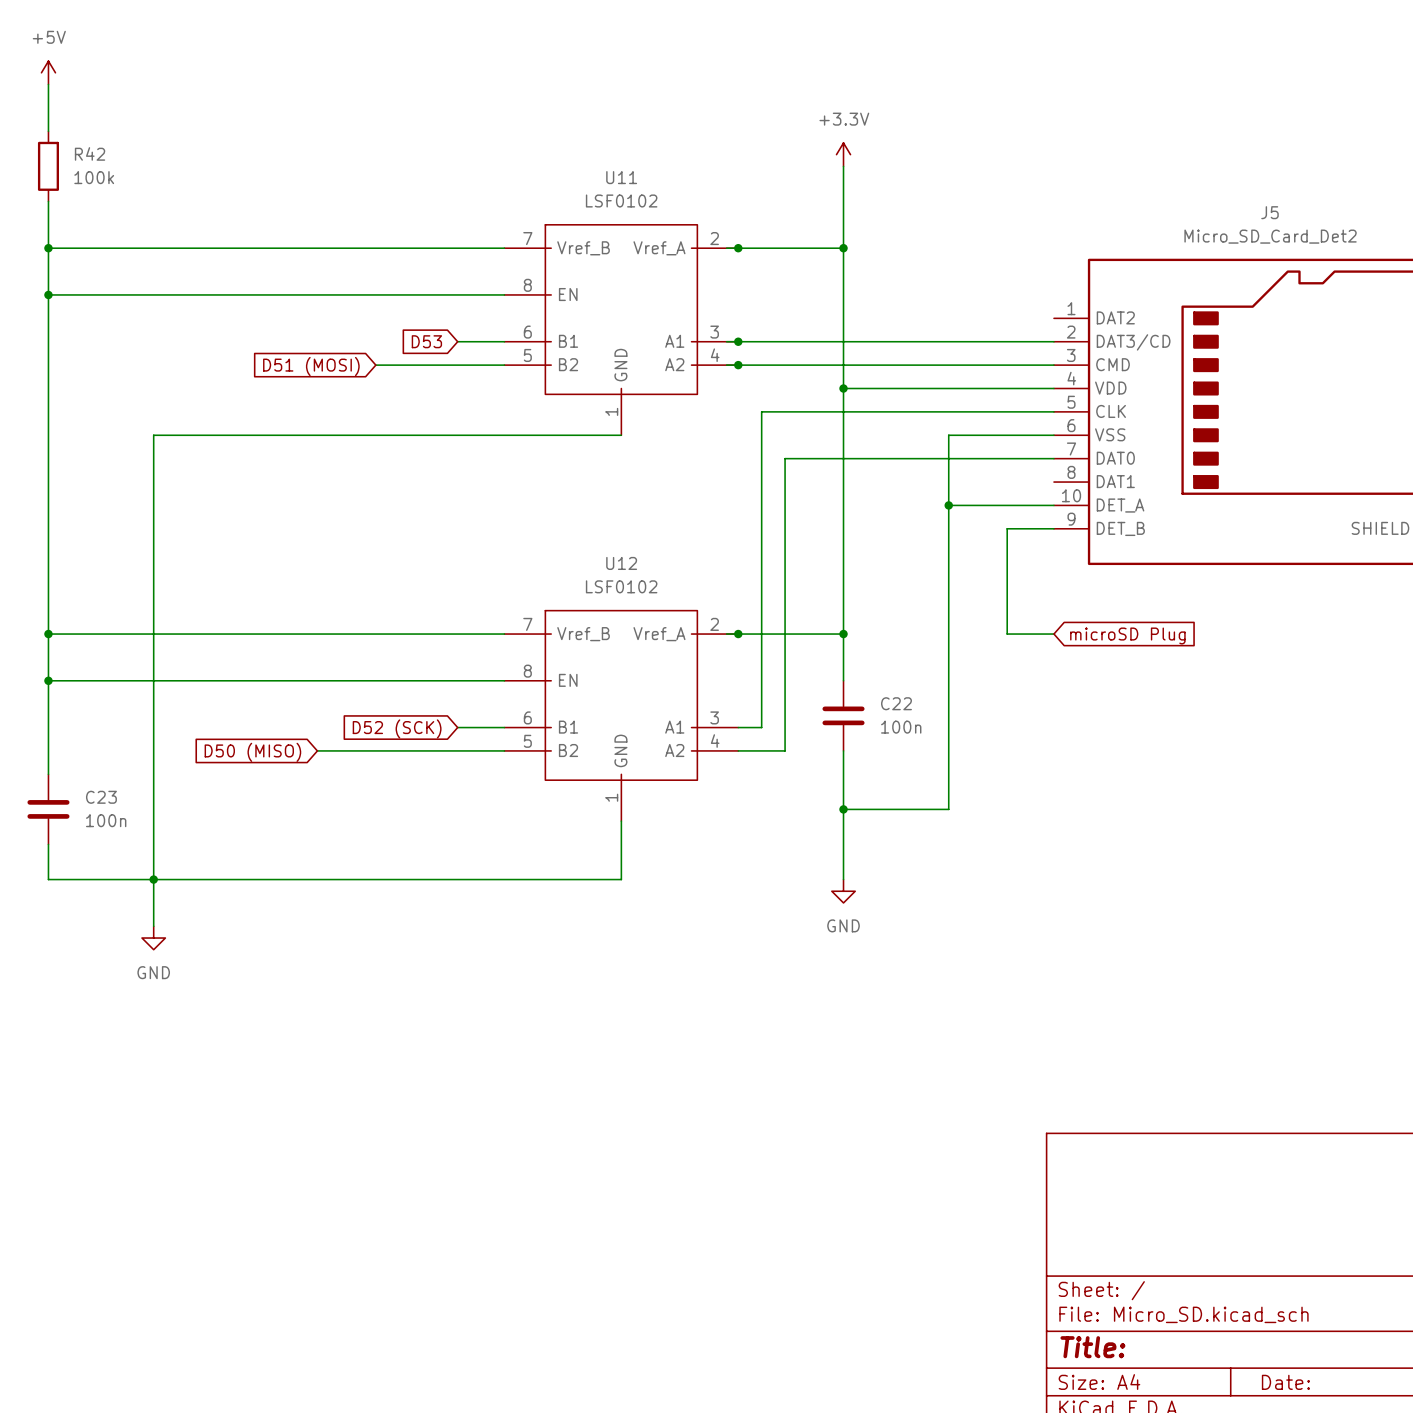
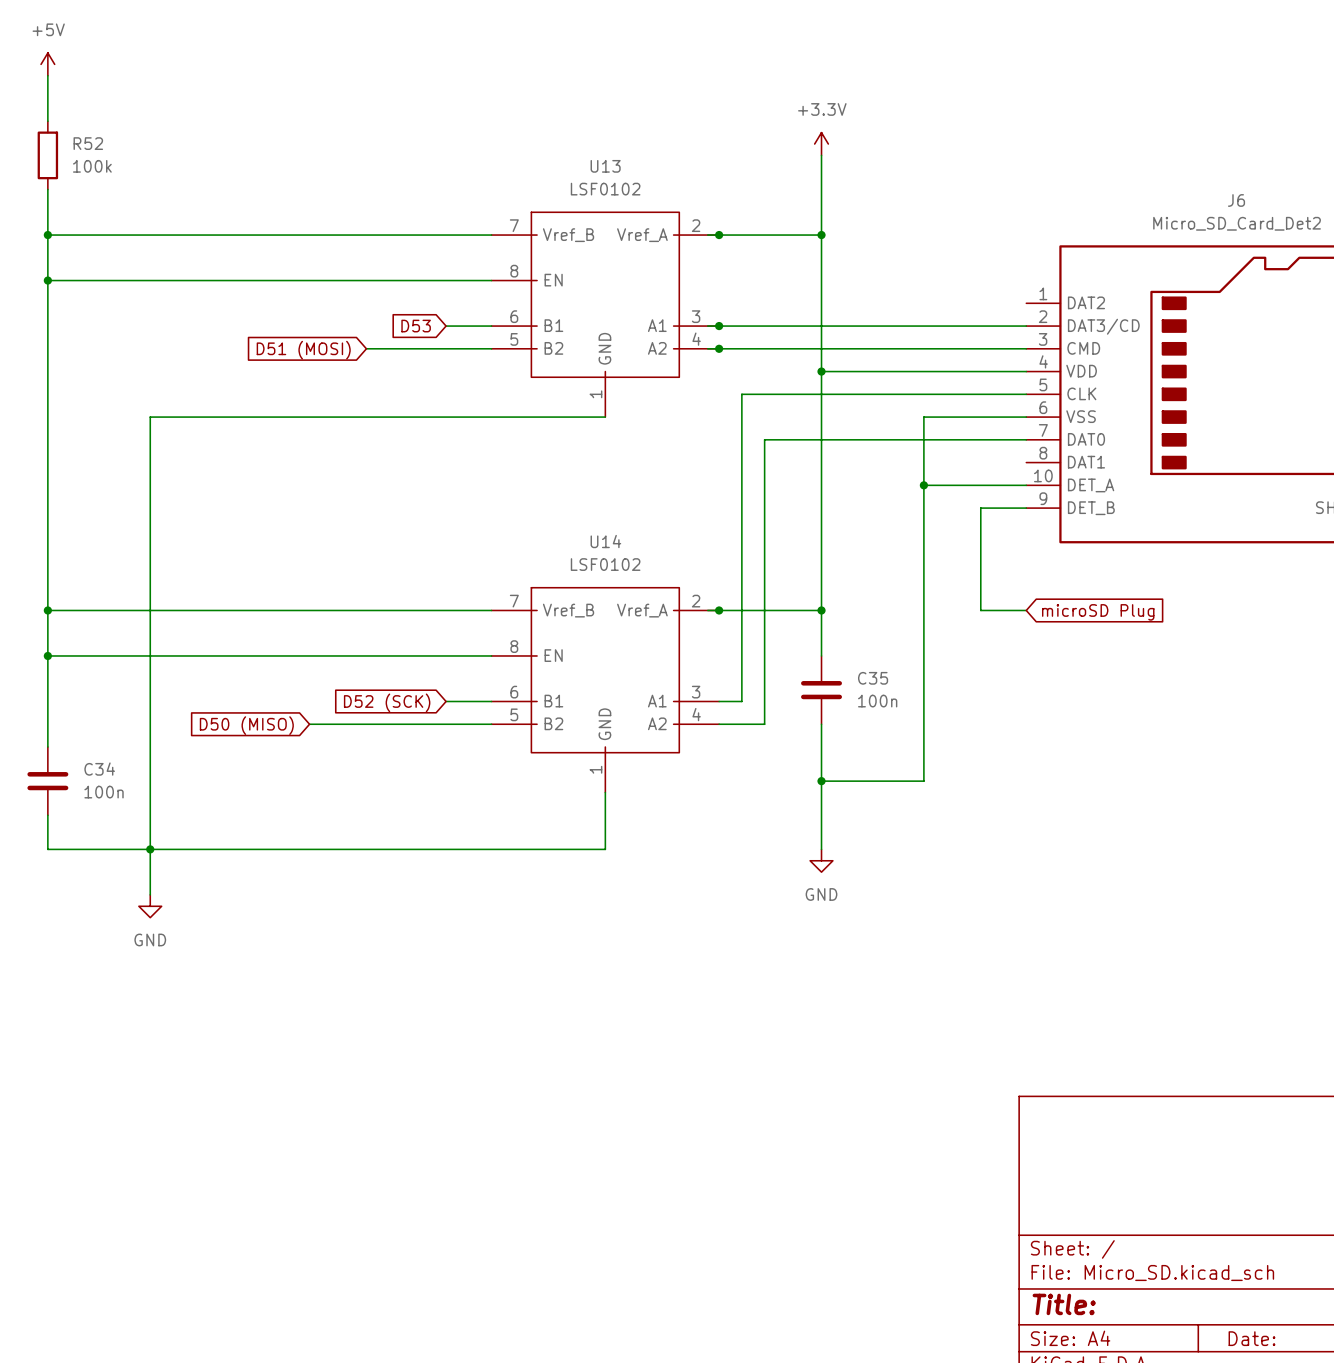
R42 name: R42 (90, 153) -> R52 (88, 143)
U11 name: U11 (621, 177) -> U13 (605, 166)
J5 name: J5 (1269, 212) -> J6 (1236, 200)
U12 name: U12 (621, 563) -> U14 (605, 541)
C22 name: C22 (896, 703) -> C35 (873, 678)
C23 name: C23 (101, 797) -> C34 (99, 769)

